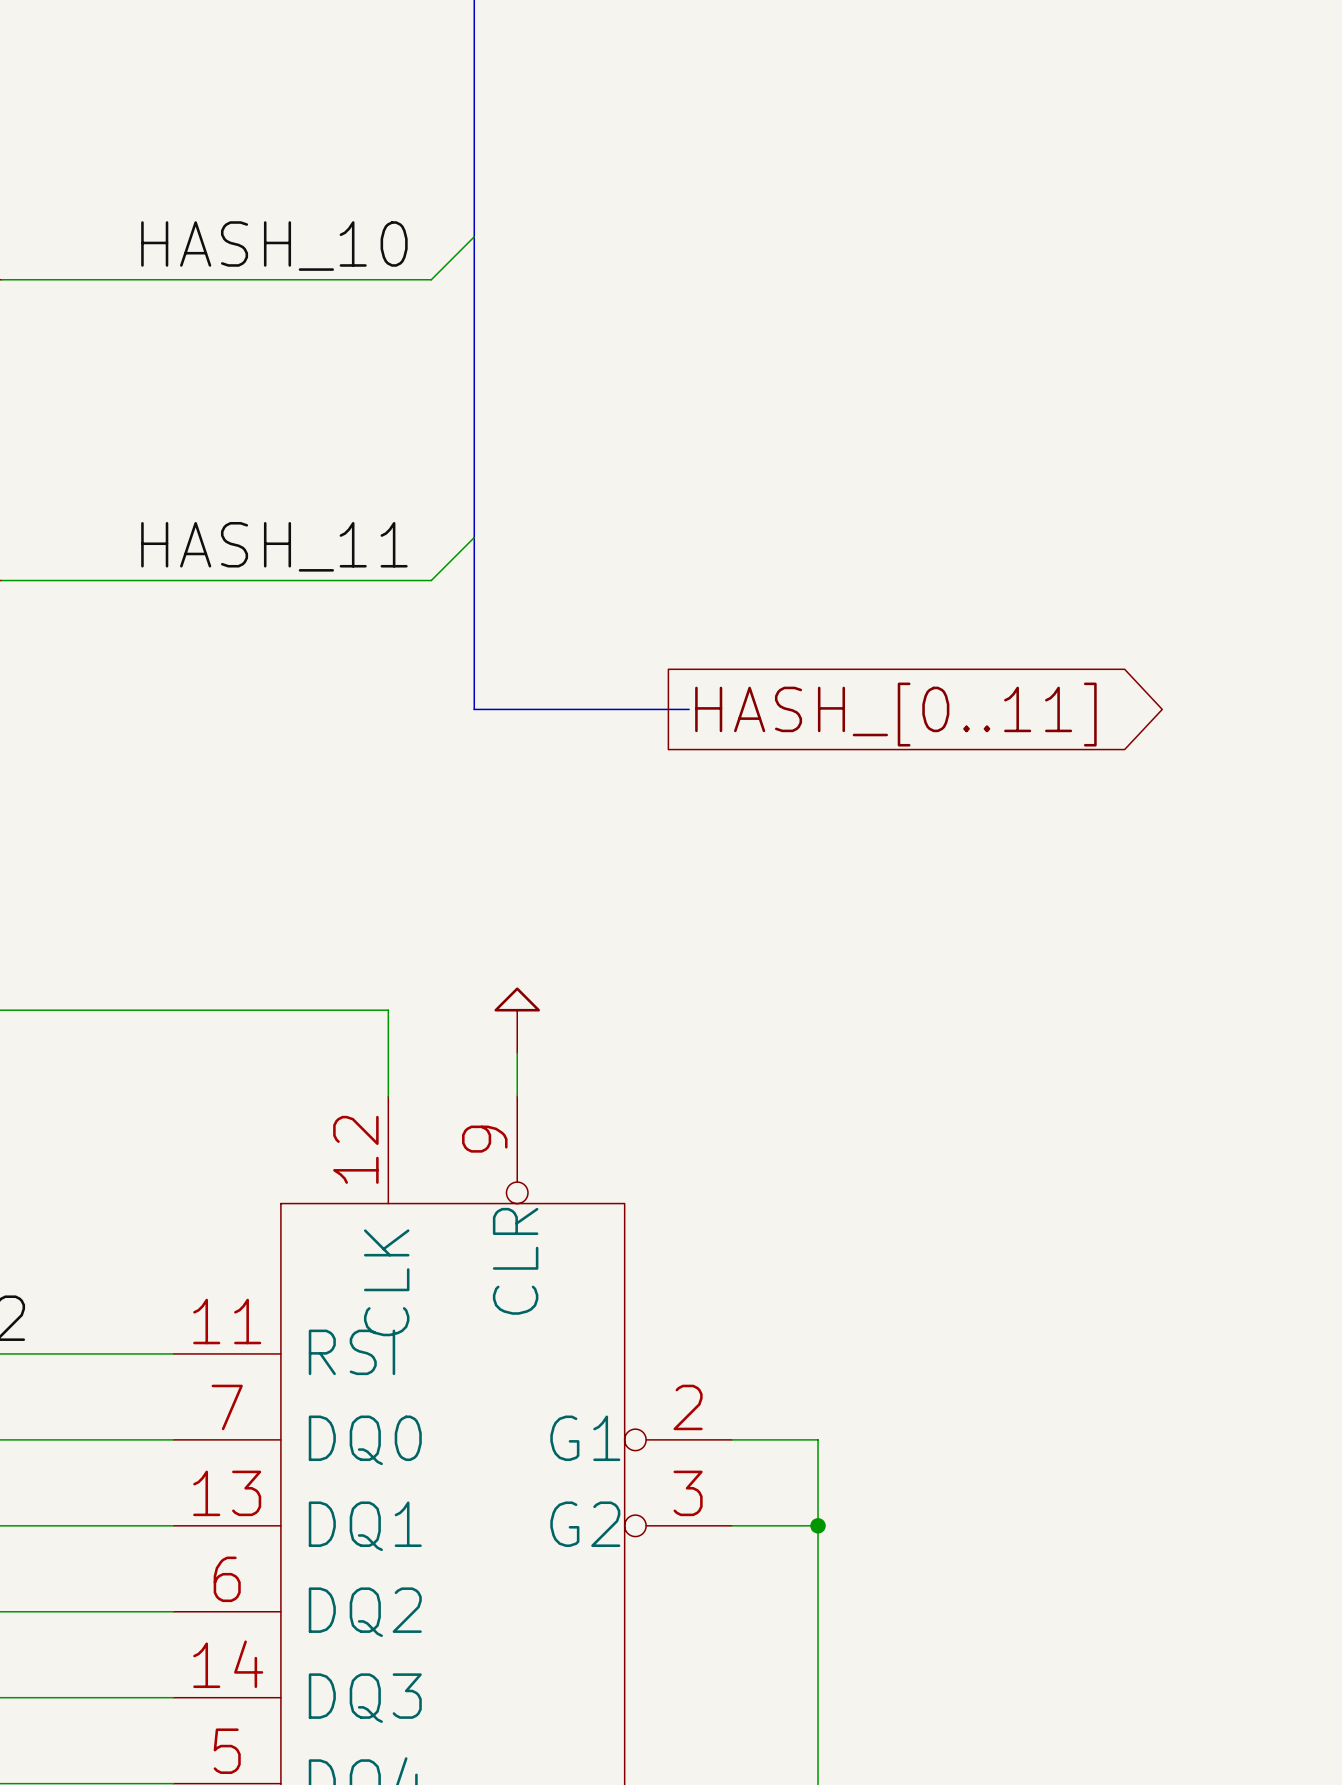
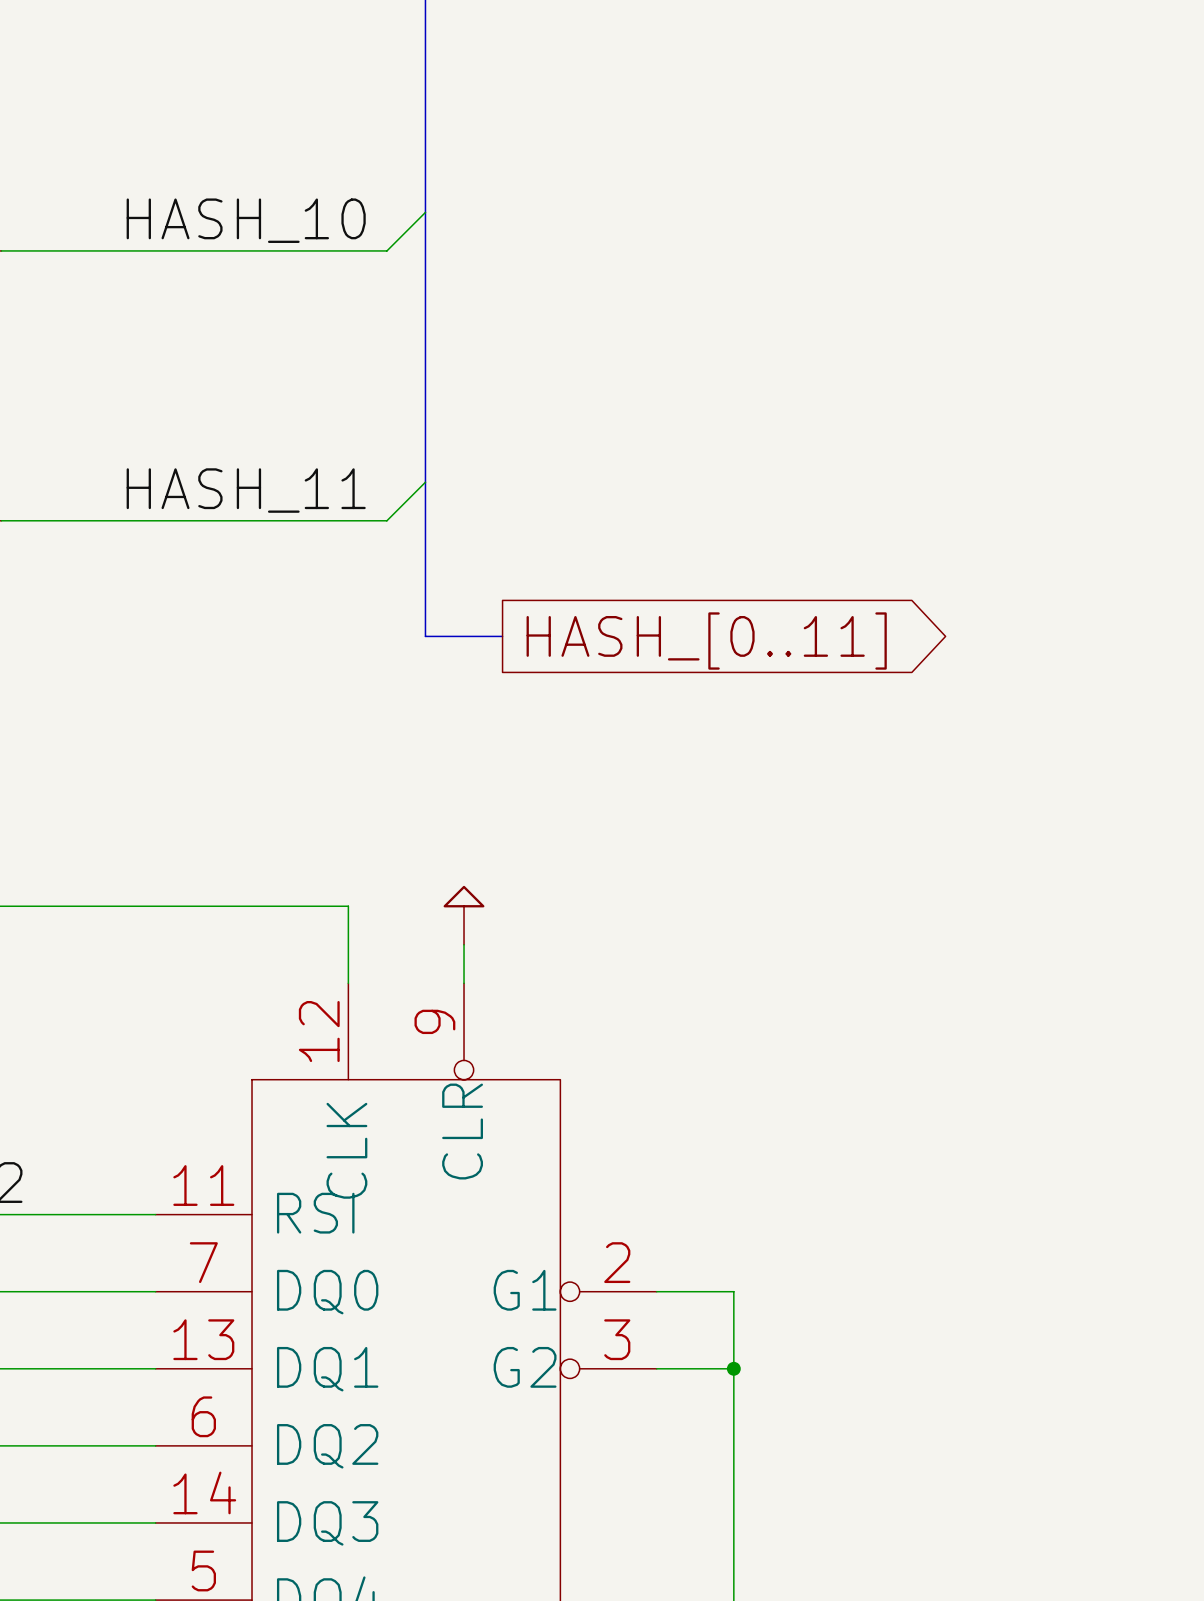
bus: (560, 709) (689, 709) -> none
global label position: HASH_[0..11] (895, 714) -> HASH_[0..11] (706, 641)

